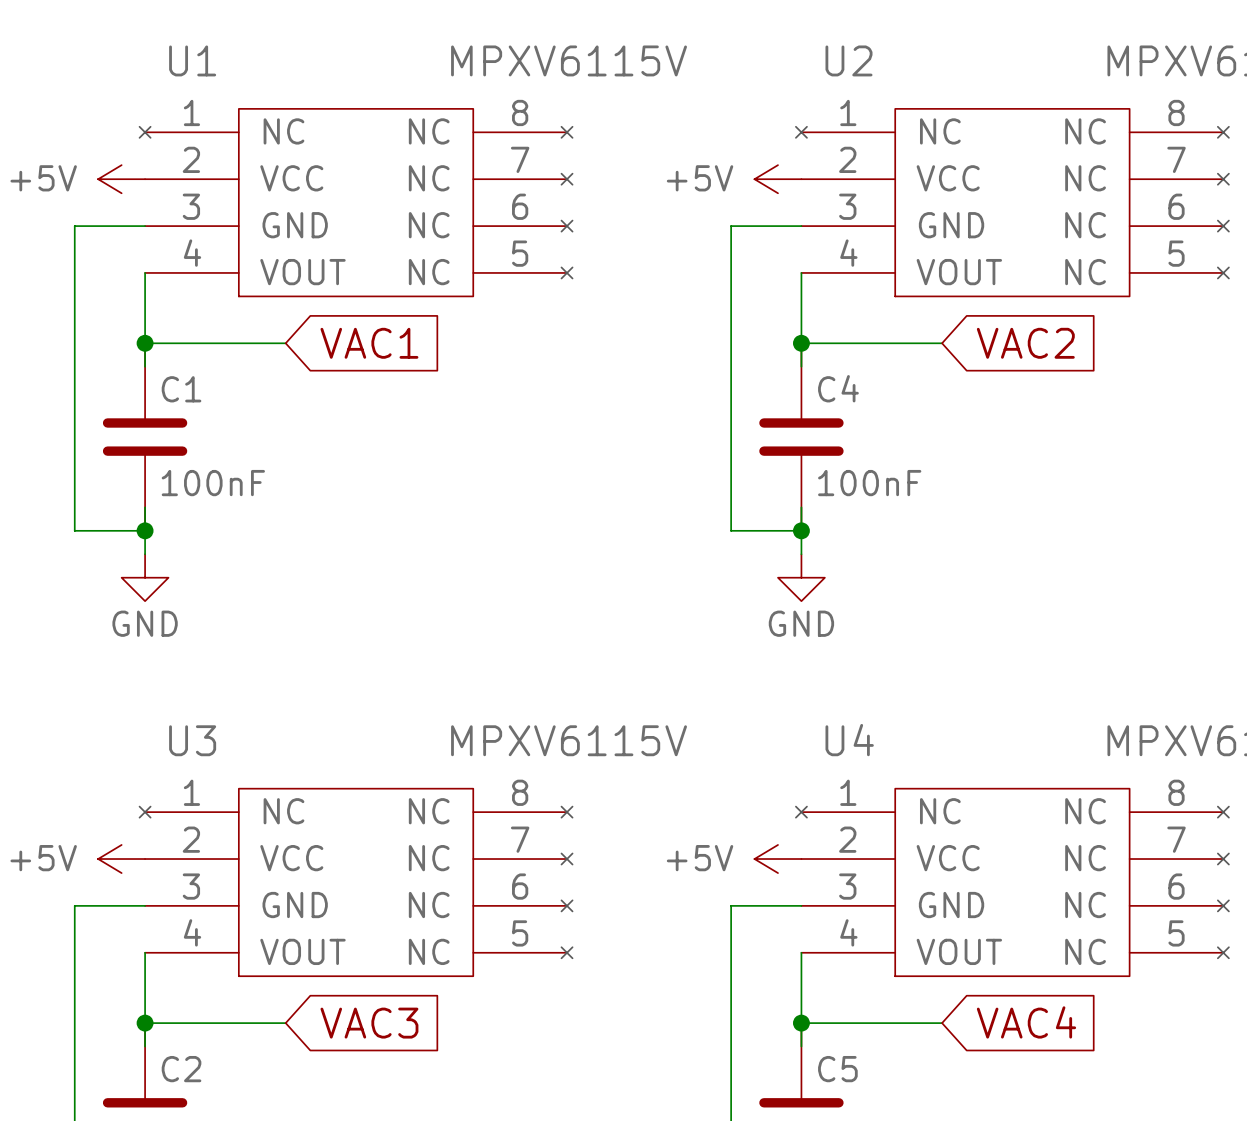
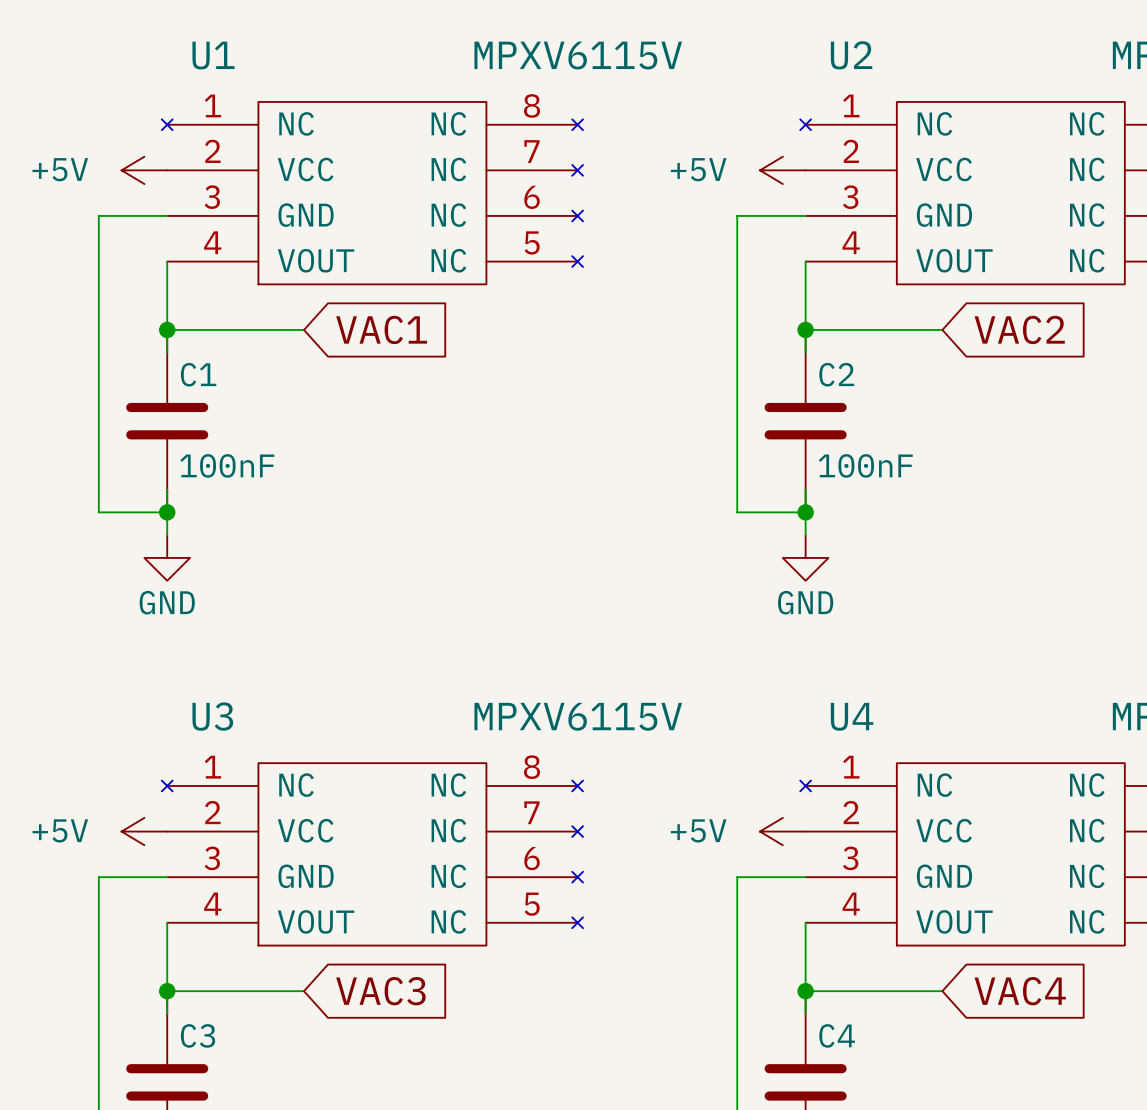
C4 name: C4 (838, 388) -> C2 (836, 374)
C2 name: C2 (181, 1069) -> C3 (198, 1035)
C5 name: C5 (837, 1069) -> C4 (837, 1035)

